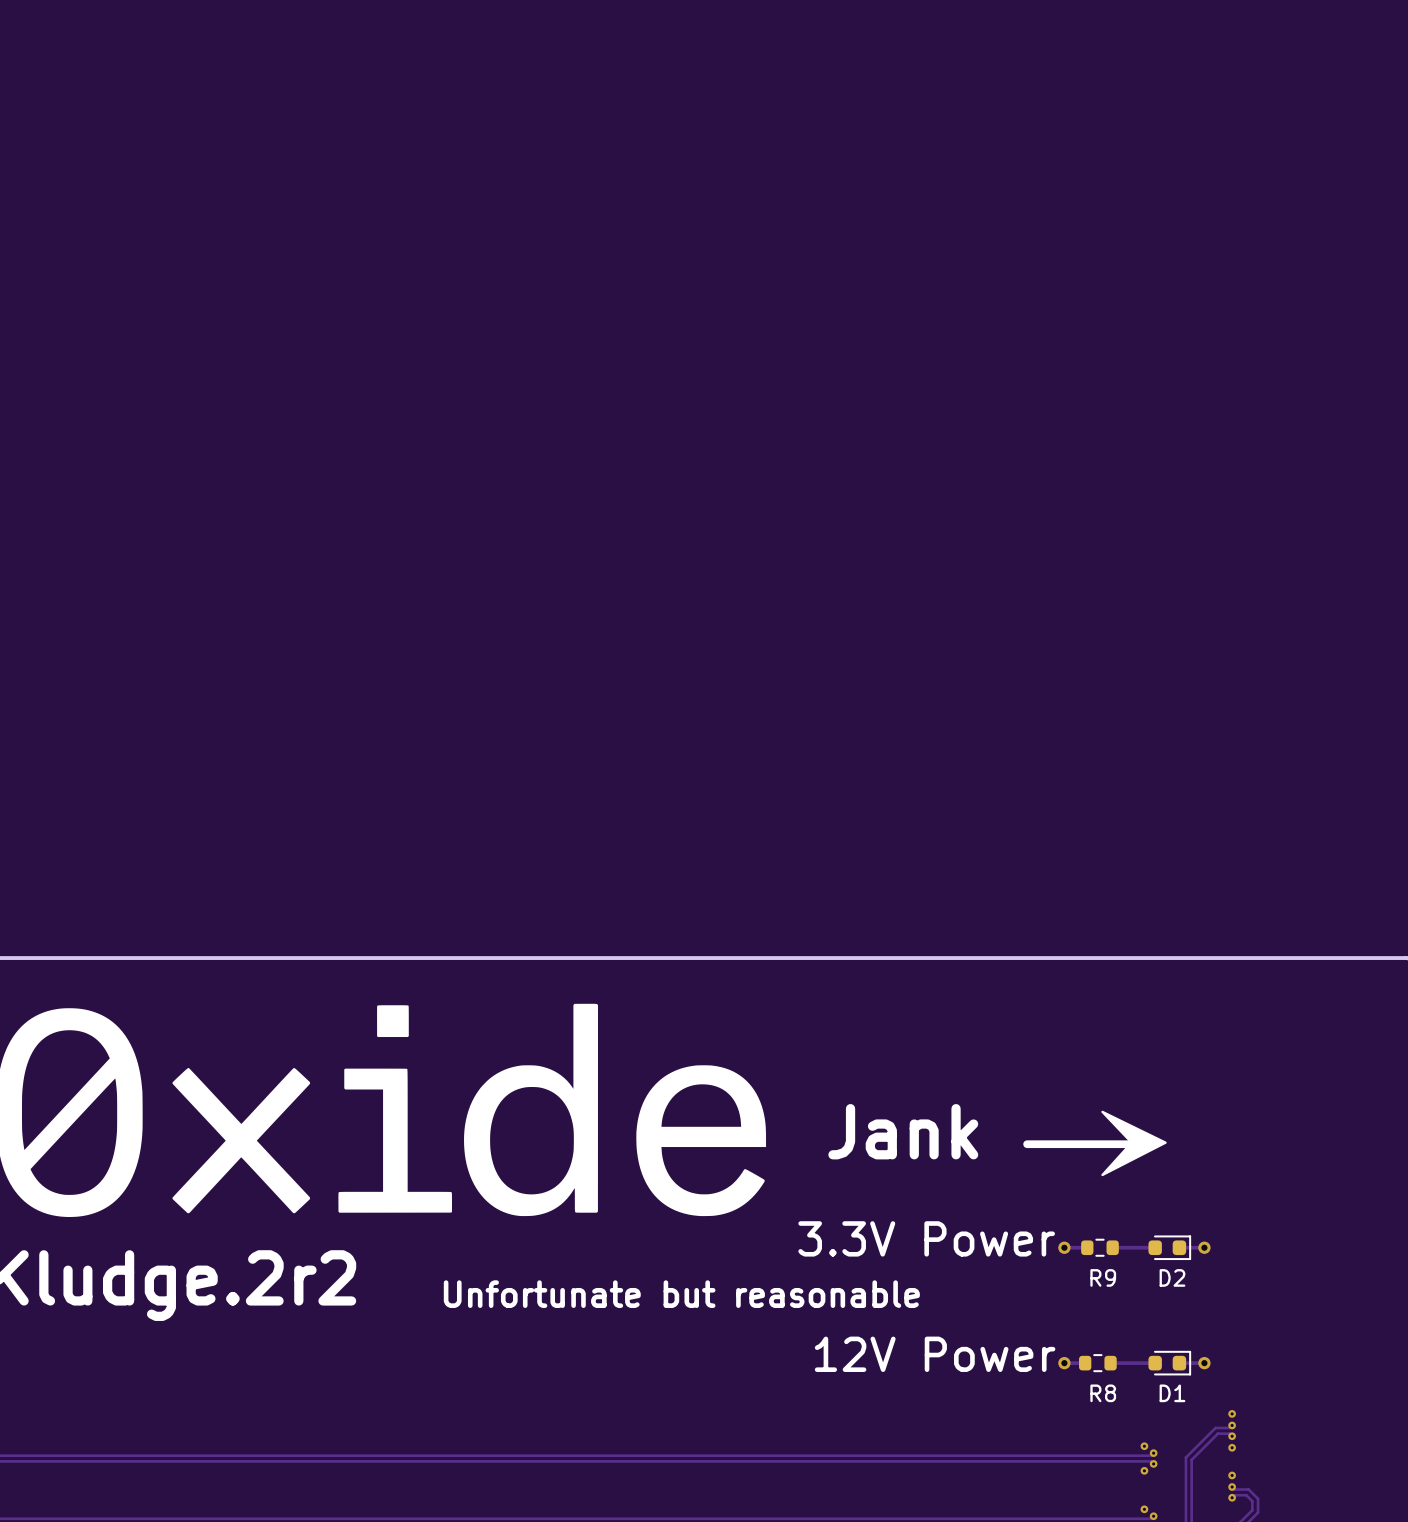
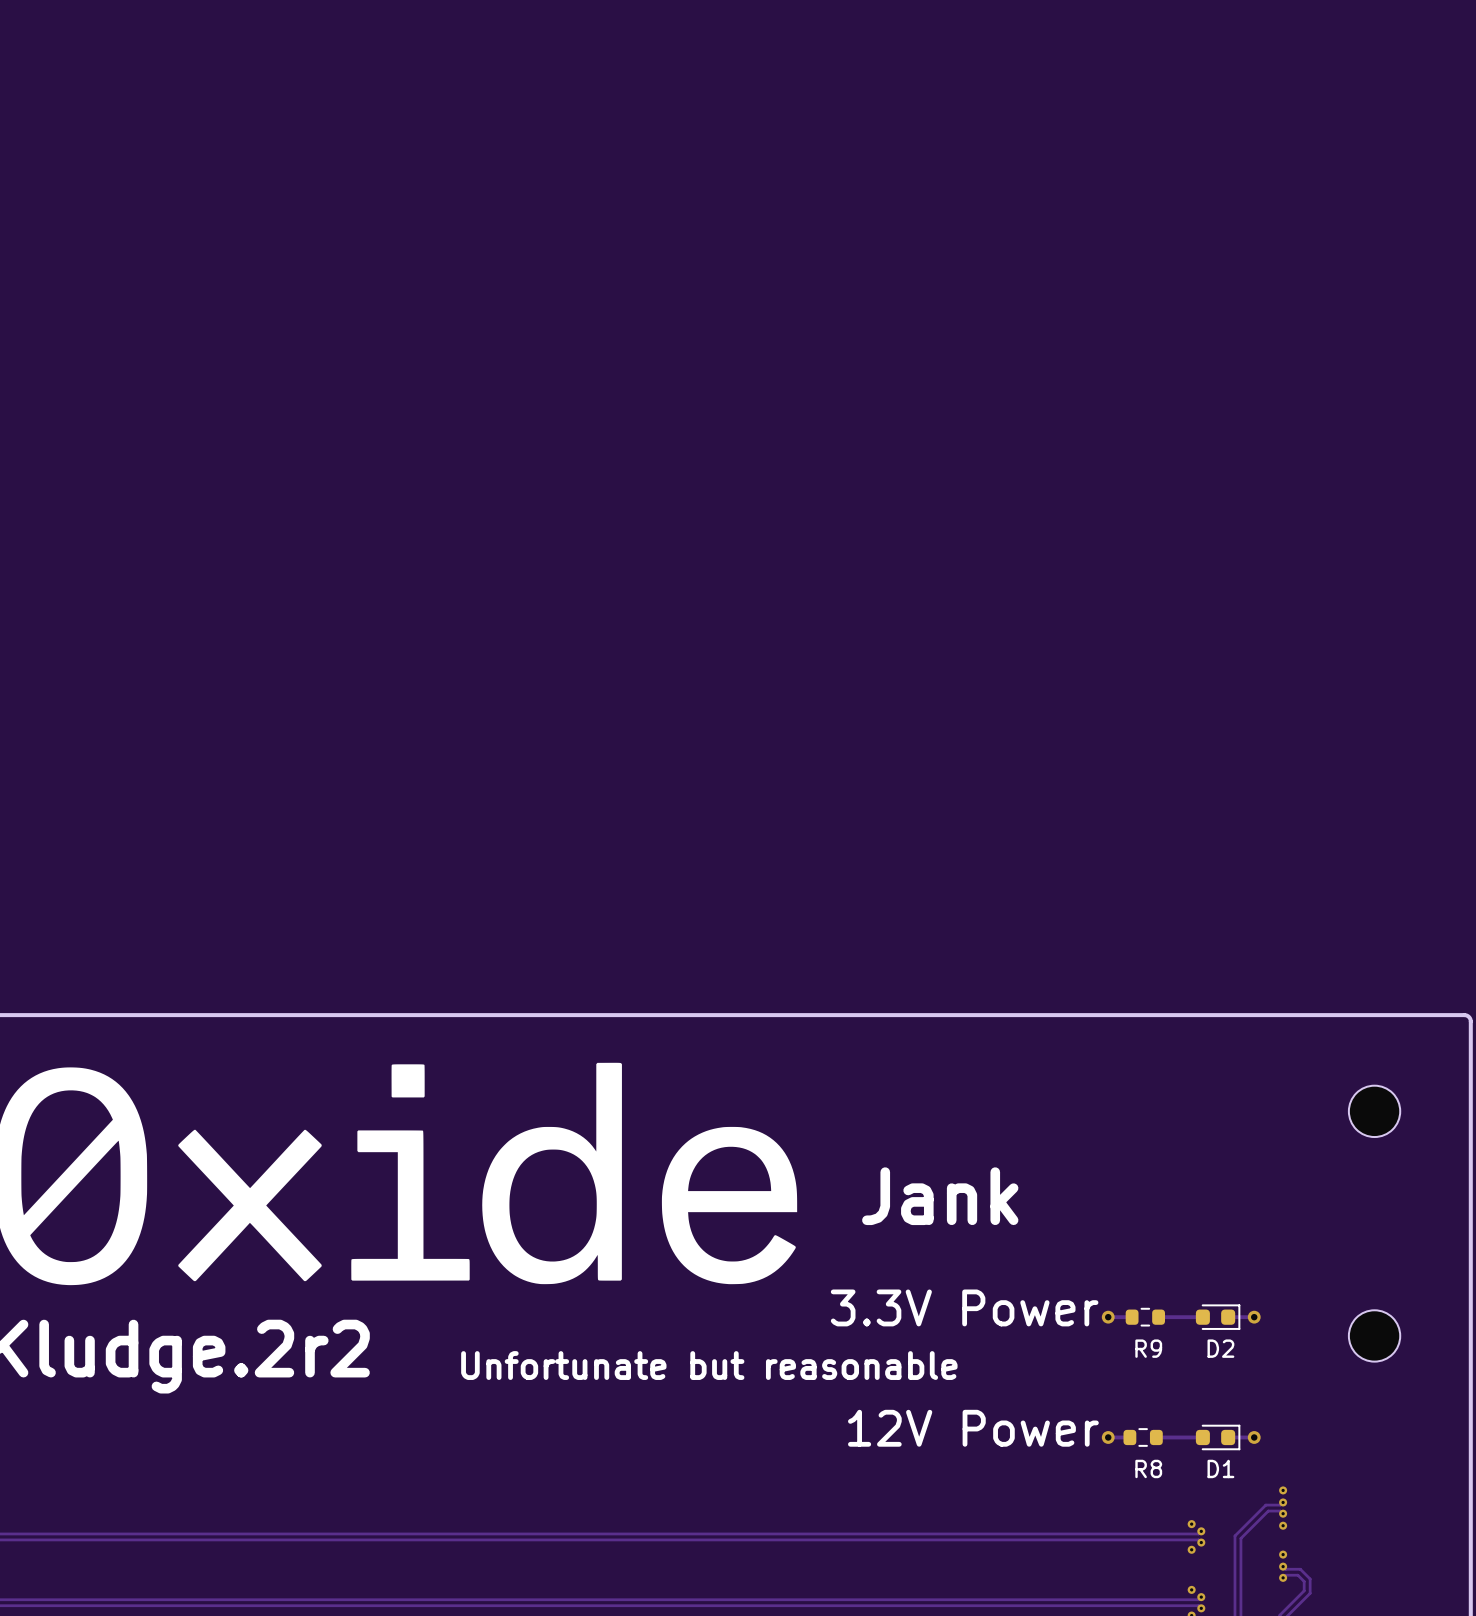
part: none -> (1374, 1111)
drawing: [1101, 1110, 1167, 1177] -> none
line: (1027, 1144) (1130, 1144) -> none
part: none -> (1374, 1335)

